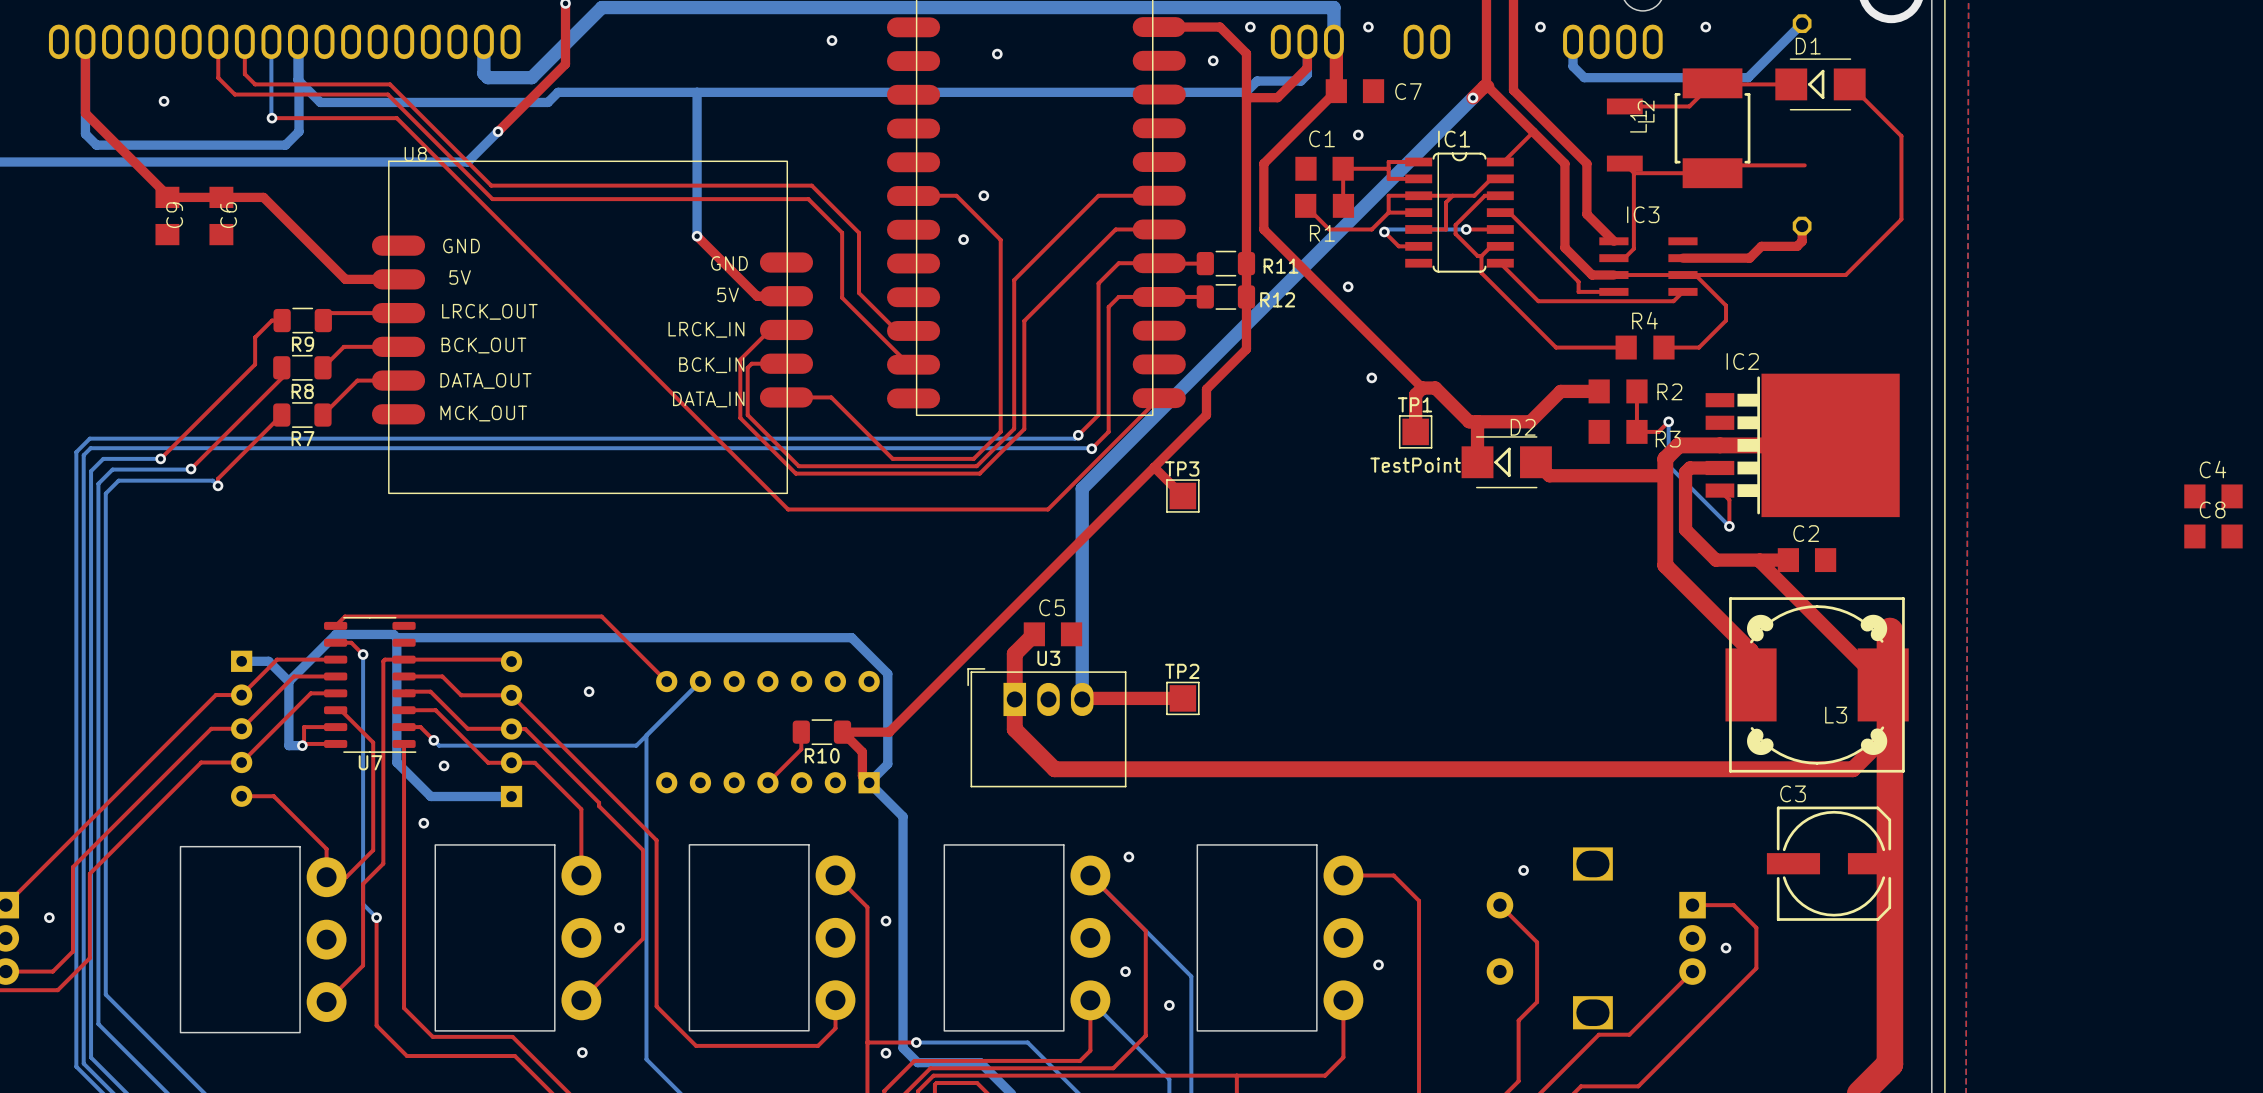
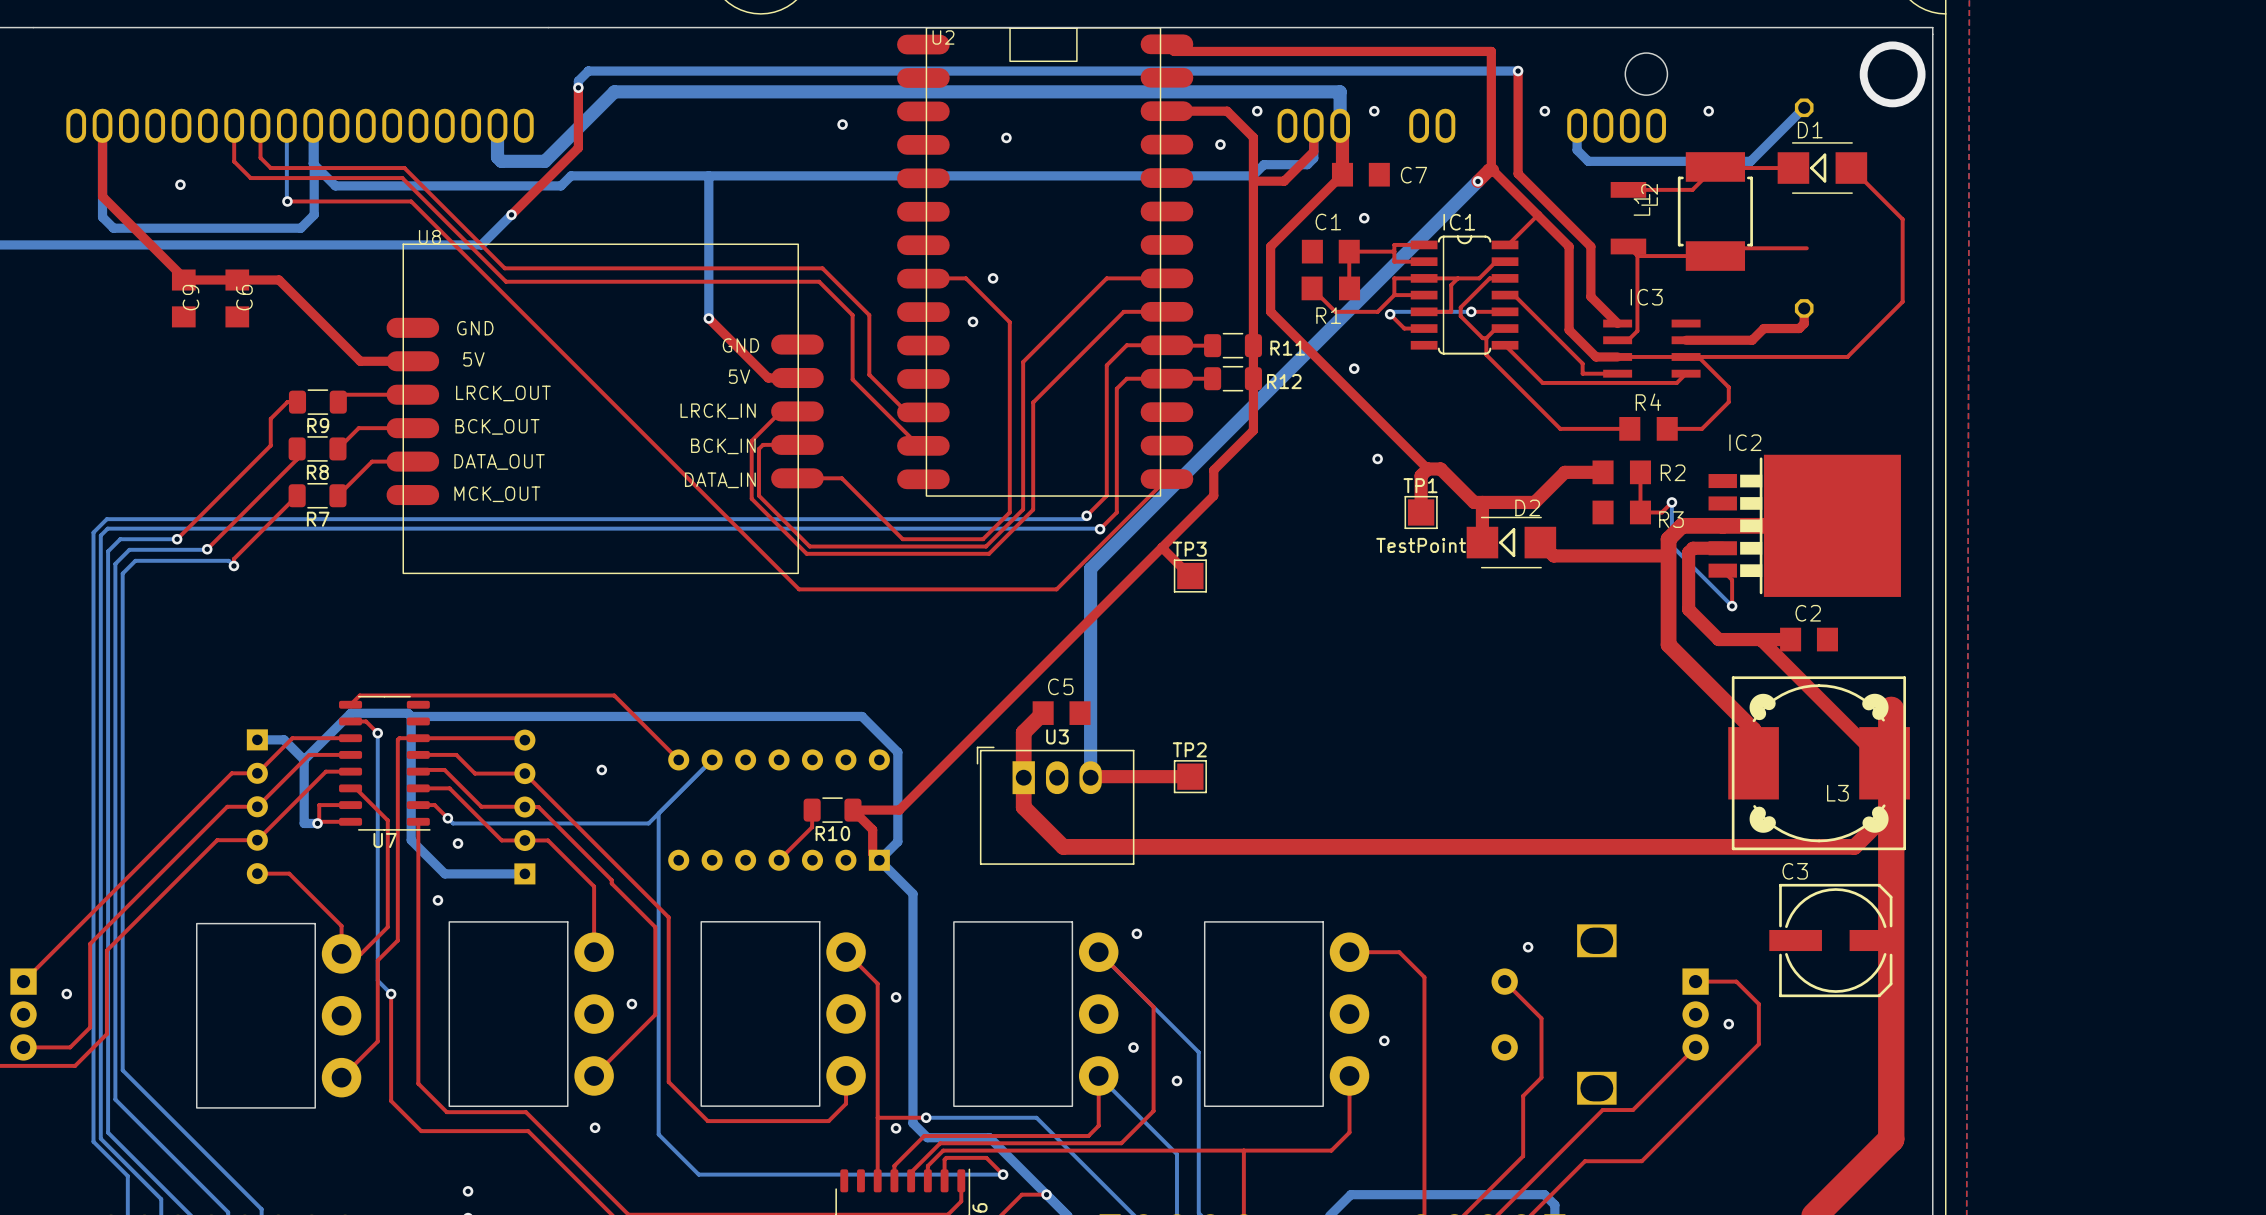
C4: (2213, 496) -> none
C8: (2213, 536) -> none

